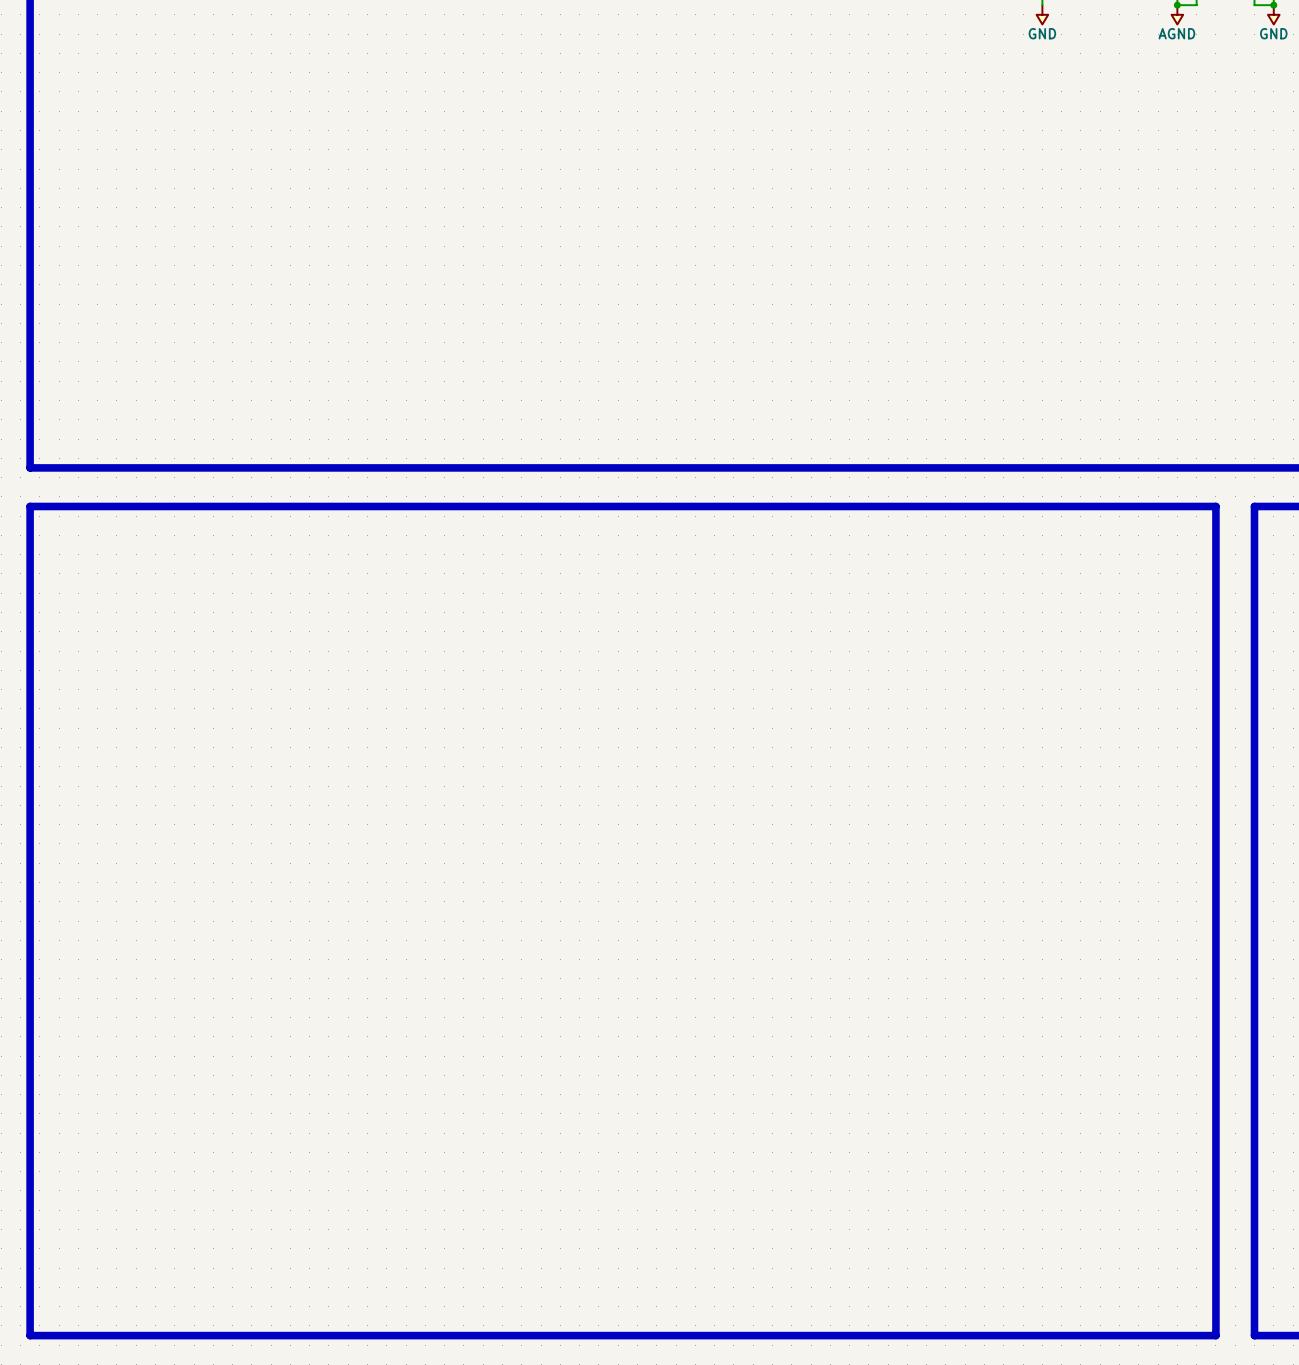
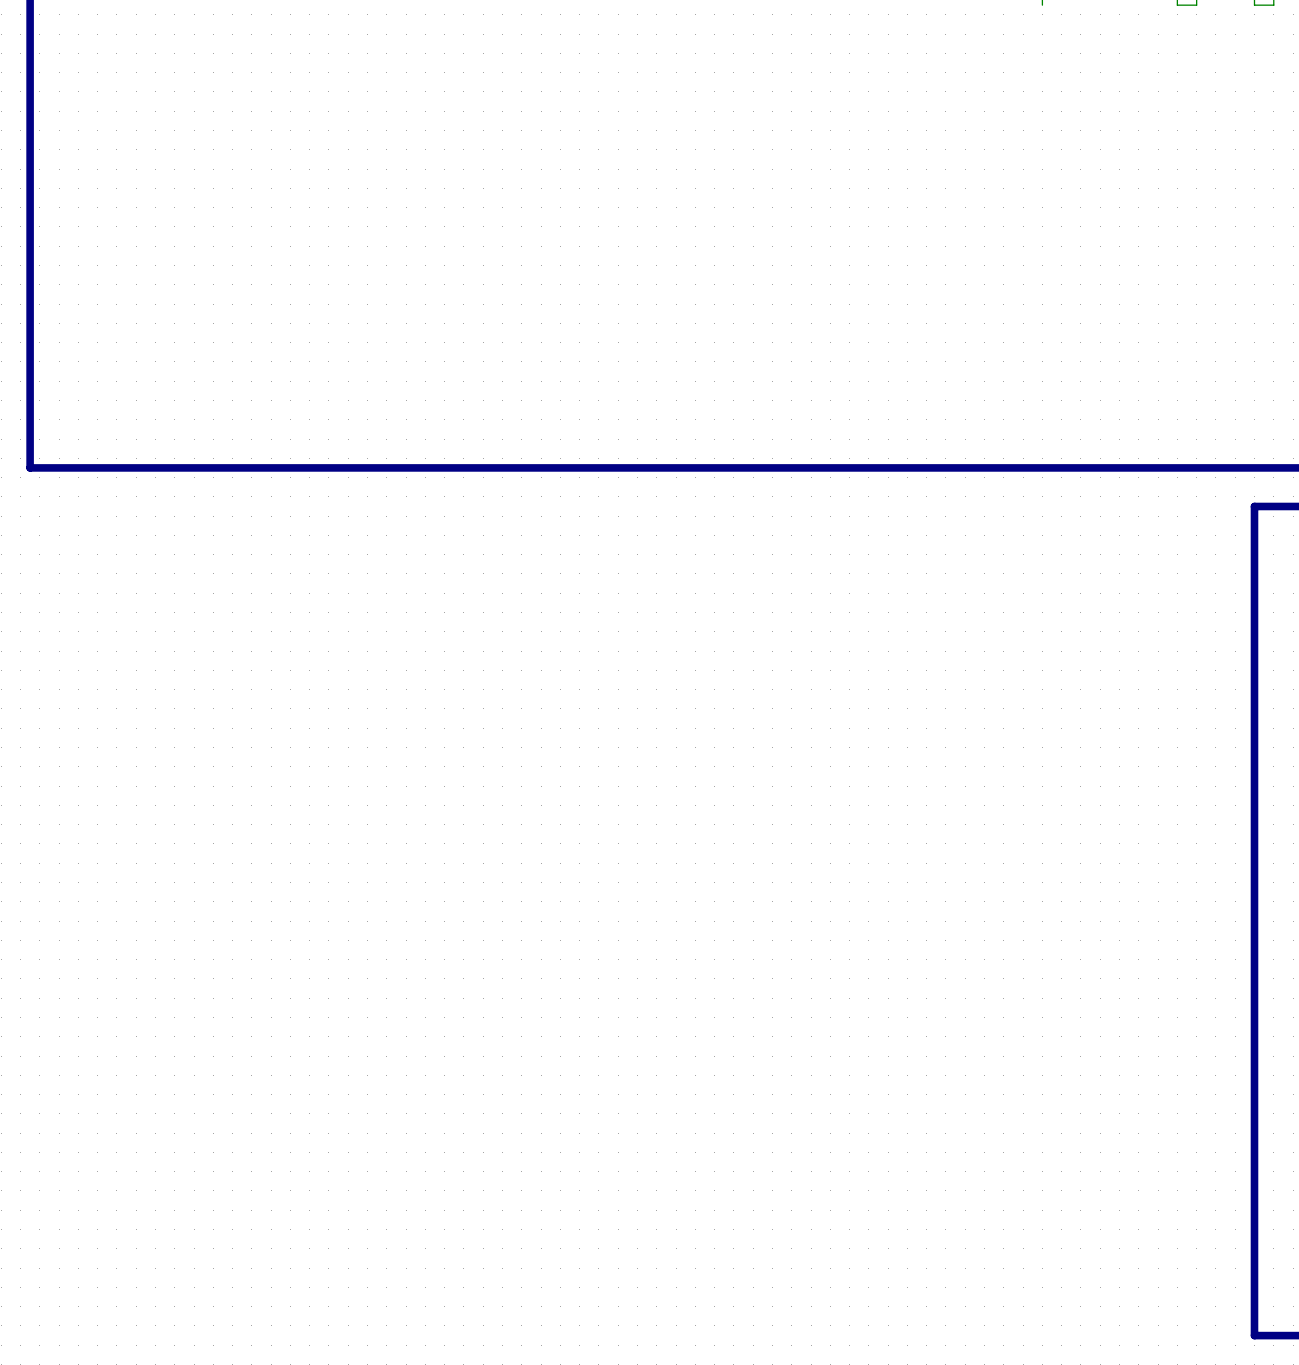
junction: (1177, 5) -> none
junction: (1273, 5) -> none
power symbol: GND (1042, 14) -> none
power symbol: AGND (1177, 14) -> none
power symbol: GND (1273, 14) -> none
line: (30, 506) (30, 1335) (1215, 1335) (1215, 506) (30, 506) -> none

